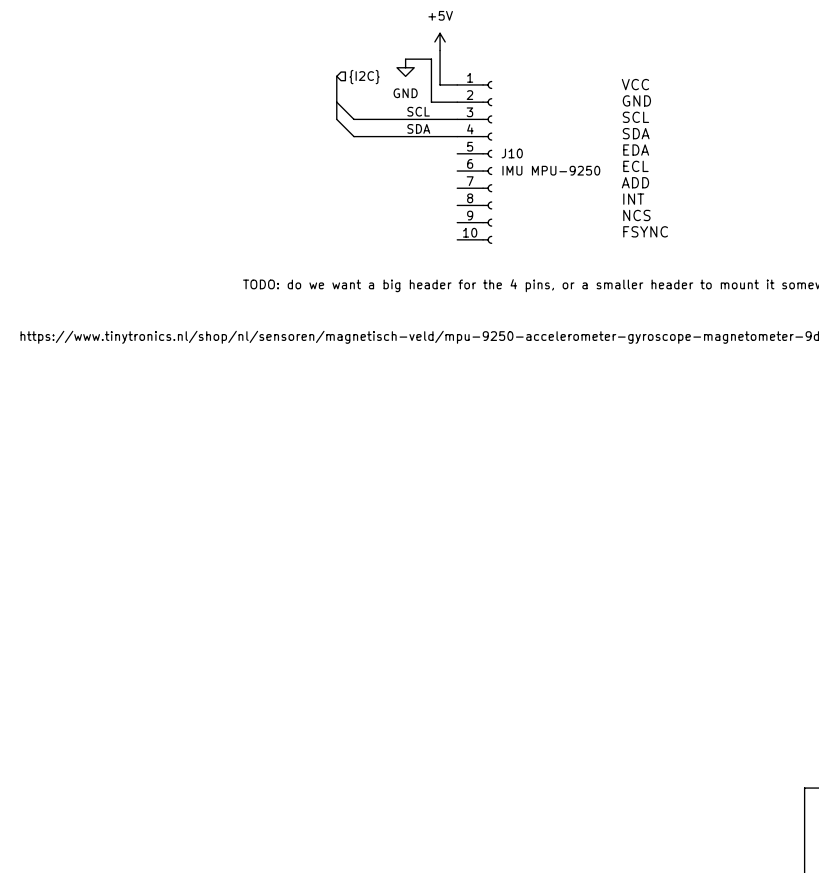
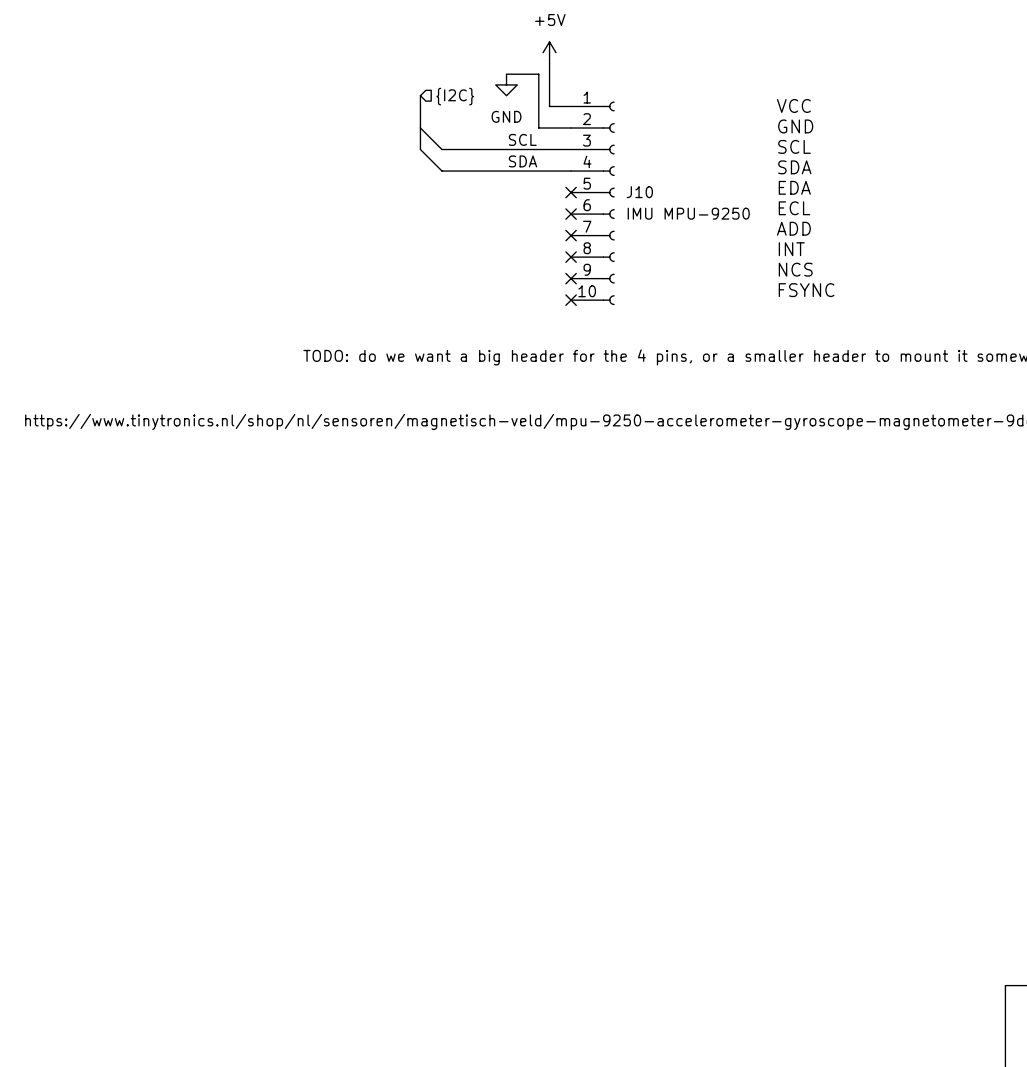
no-connect mark: none -> (571, 192)
no-connect mark: none -> (571, 214)
no-connect mark: none -> (571, 235)
no-connect mark: none -> (571, 257)
no-connect mark: none -> (571, 278)
no-connect mark: none -> (571, 300)

